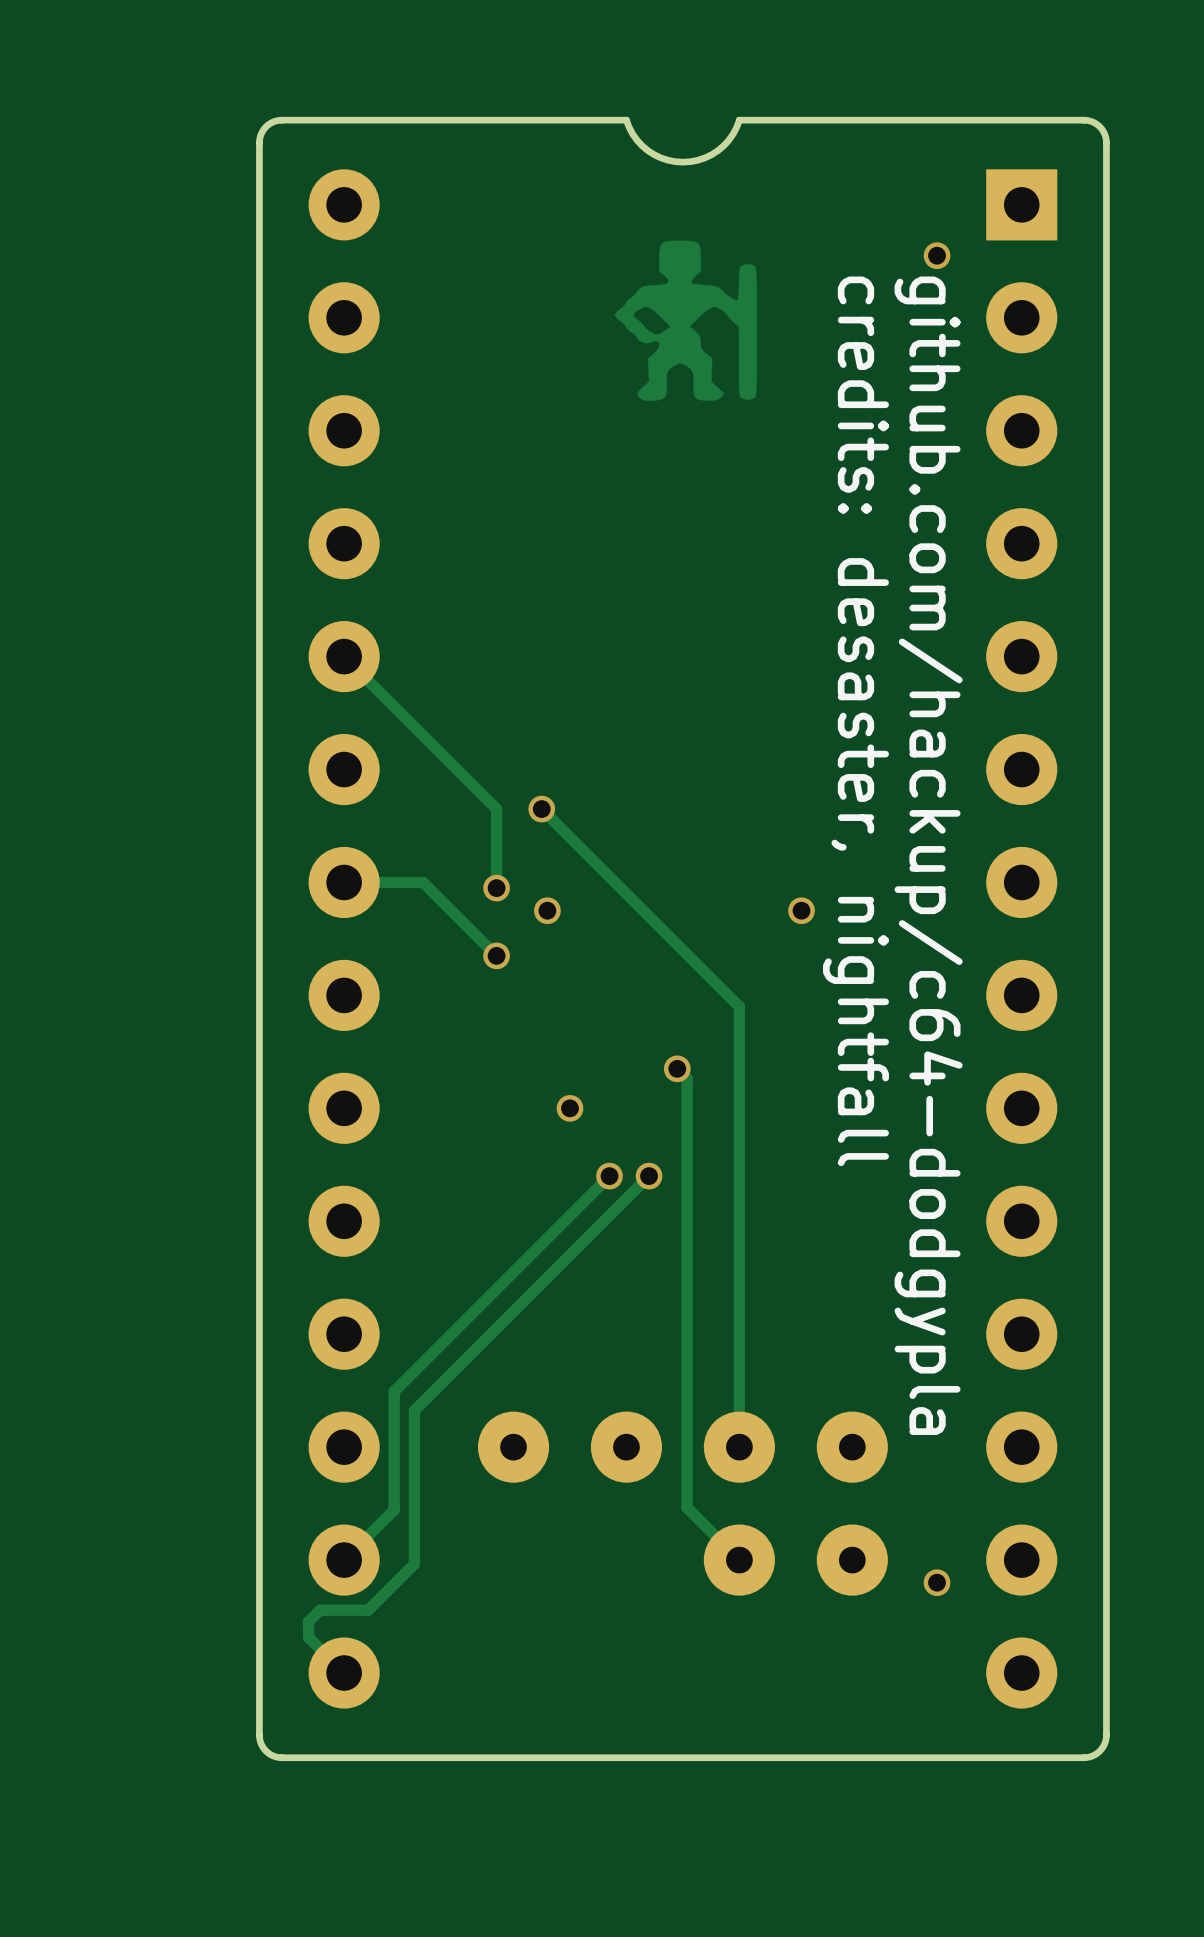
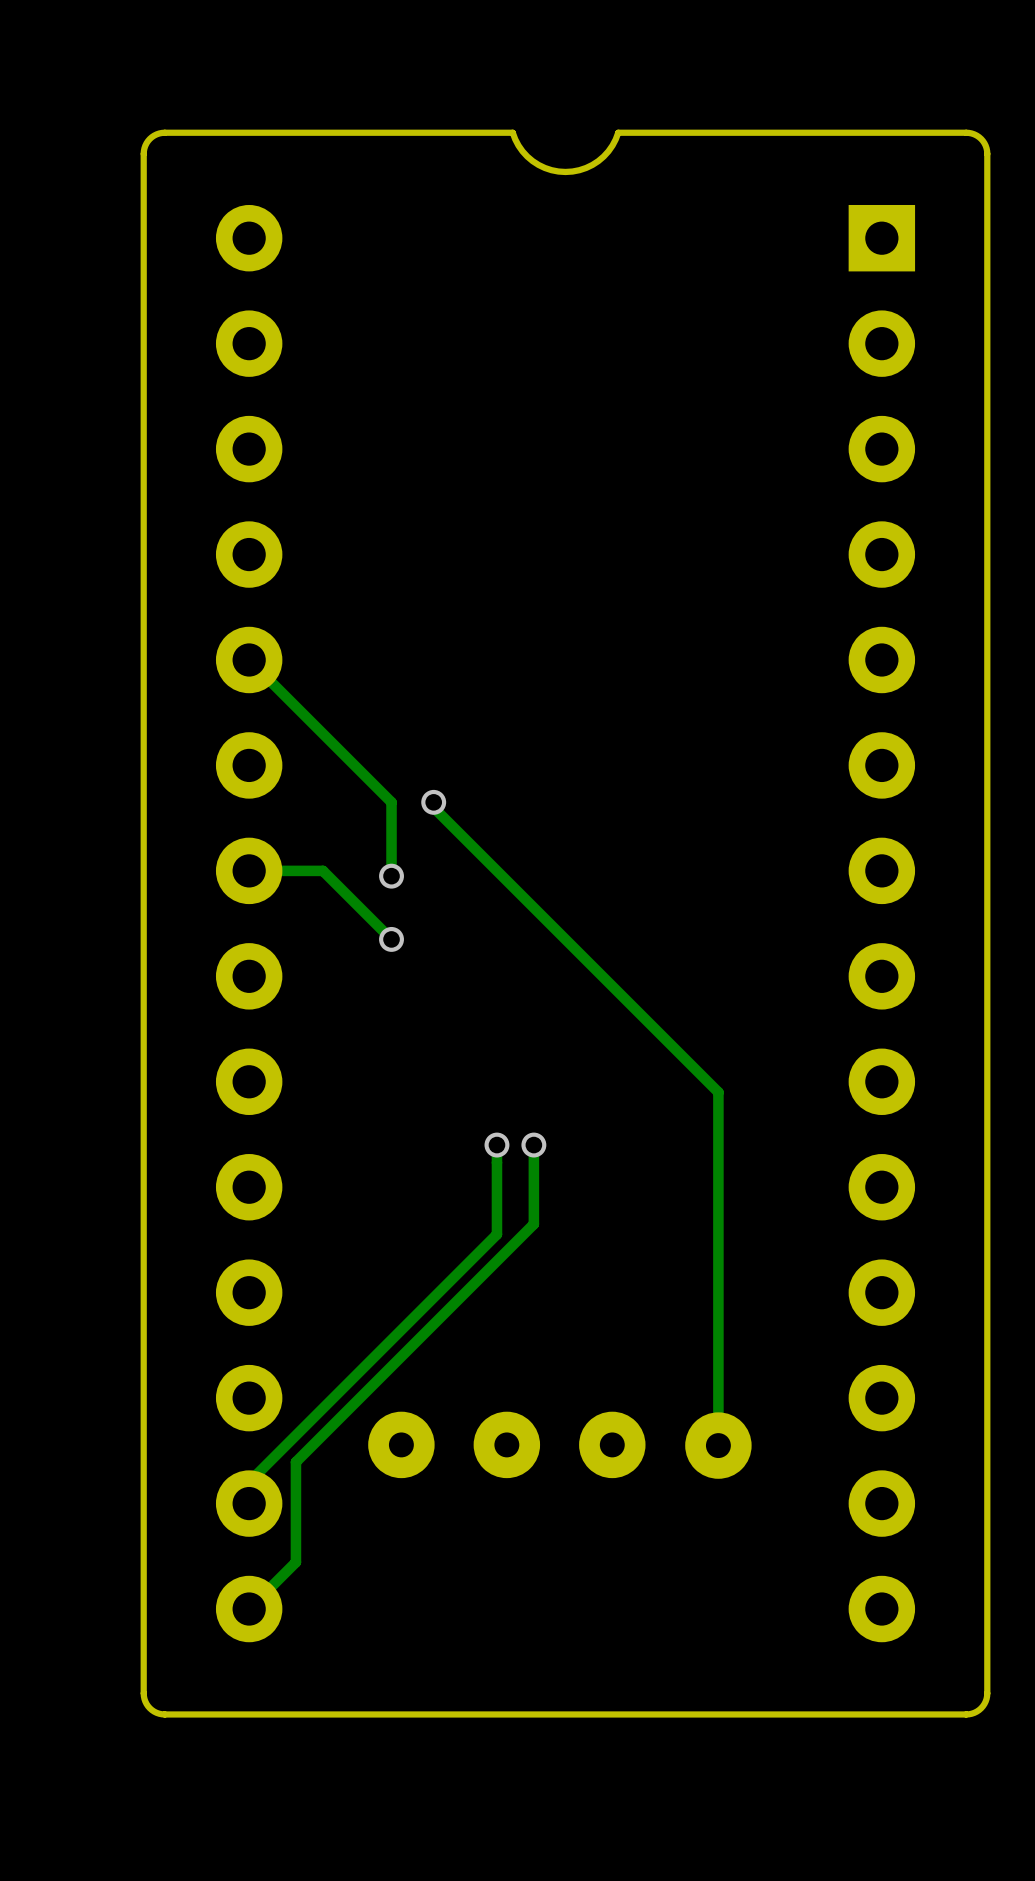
board edge: none -> (512, 132) (518, 145) (532, 161) (544, 167) (565, 171) (579, 170) (598, 161) (608, 151) (618, 132) (966, 132) (979, 137) (986, 148) (986, 1698) (979, 1710) (966, 1714) (164, 1714) (156, 1712) (149, 1708) (145, 1701) (143, 1693)
board edge: none -> (512, 132) (164, 132) (151, 137) (144, 148) (143, 1693)
board edge: (626, 120) (632, 133) (647, 150) (660, 157) (682, 162) (697, 160) (718, 150) (728, 140) (739, 120) (1083, 120) (1097, 124) (1105, 136) (1106, 1735) (1101, 1748) (1089, 1756) (282, 1757) (268, 1753) (260, 1740) (260, 136) (268, 124) (282, 120) (626, 120) -> none
drawing: [614, 240, 757, 402] -> none
via: (937, 255) -> none
text: credits: desaster, nightfall (855, 721) -> none
track: (541, 809) (739, 1006) (739, 1447) -> none
track: none -> (433, 807) (718, 1092) (718, 1445)
text: github.com/hackup/c64-dodgypla (928, 855) -> none
via: (547, 910) -> none
via: (801, 910) -> none
track: (677, 1068) (687, 1078) (687, 1507) (739, 1560) -> none
via: (677, 1068) -> none
via: (570, 1108) -> none
track: (609, 1176) (394, 1391) (394, 1509) (344, 1560) -> (496, 1145) (496, 1234) (249, 1482) (249, 1503)
track: (649, 1176) (414, 1410) (414, 1563) (368, 1610) (320, 1610) (308, 1621) (308, 1637) (344, 1673) -> (533, 1145) (533, 1224) (295, 1462) (295, 1562) (249, 1609)
part: none -> (401, 1444)
part: none -> (506, 1444)
part: none -> (612, 1444)
part: none -> (718, 1445)
part: (682, 1503) -> none
via: (937, 1582) -> none

